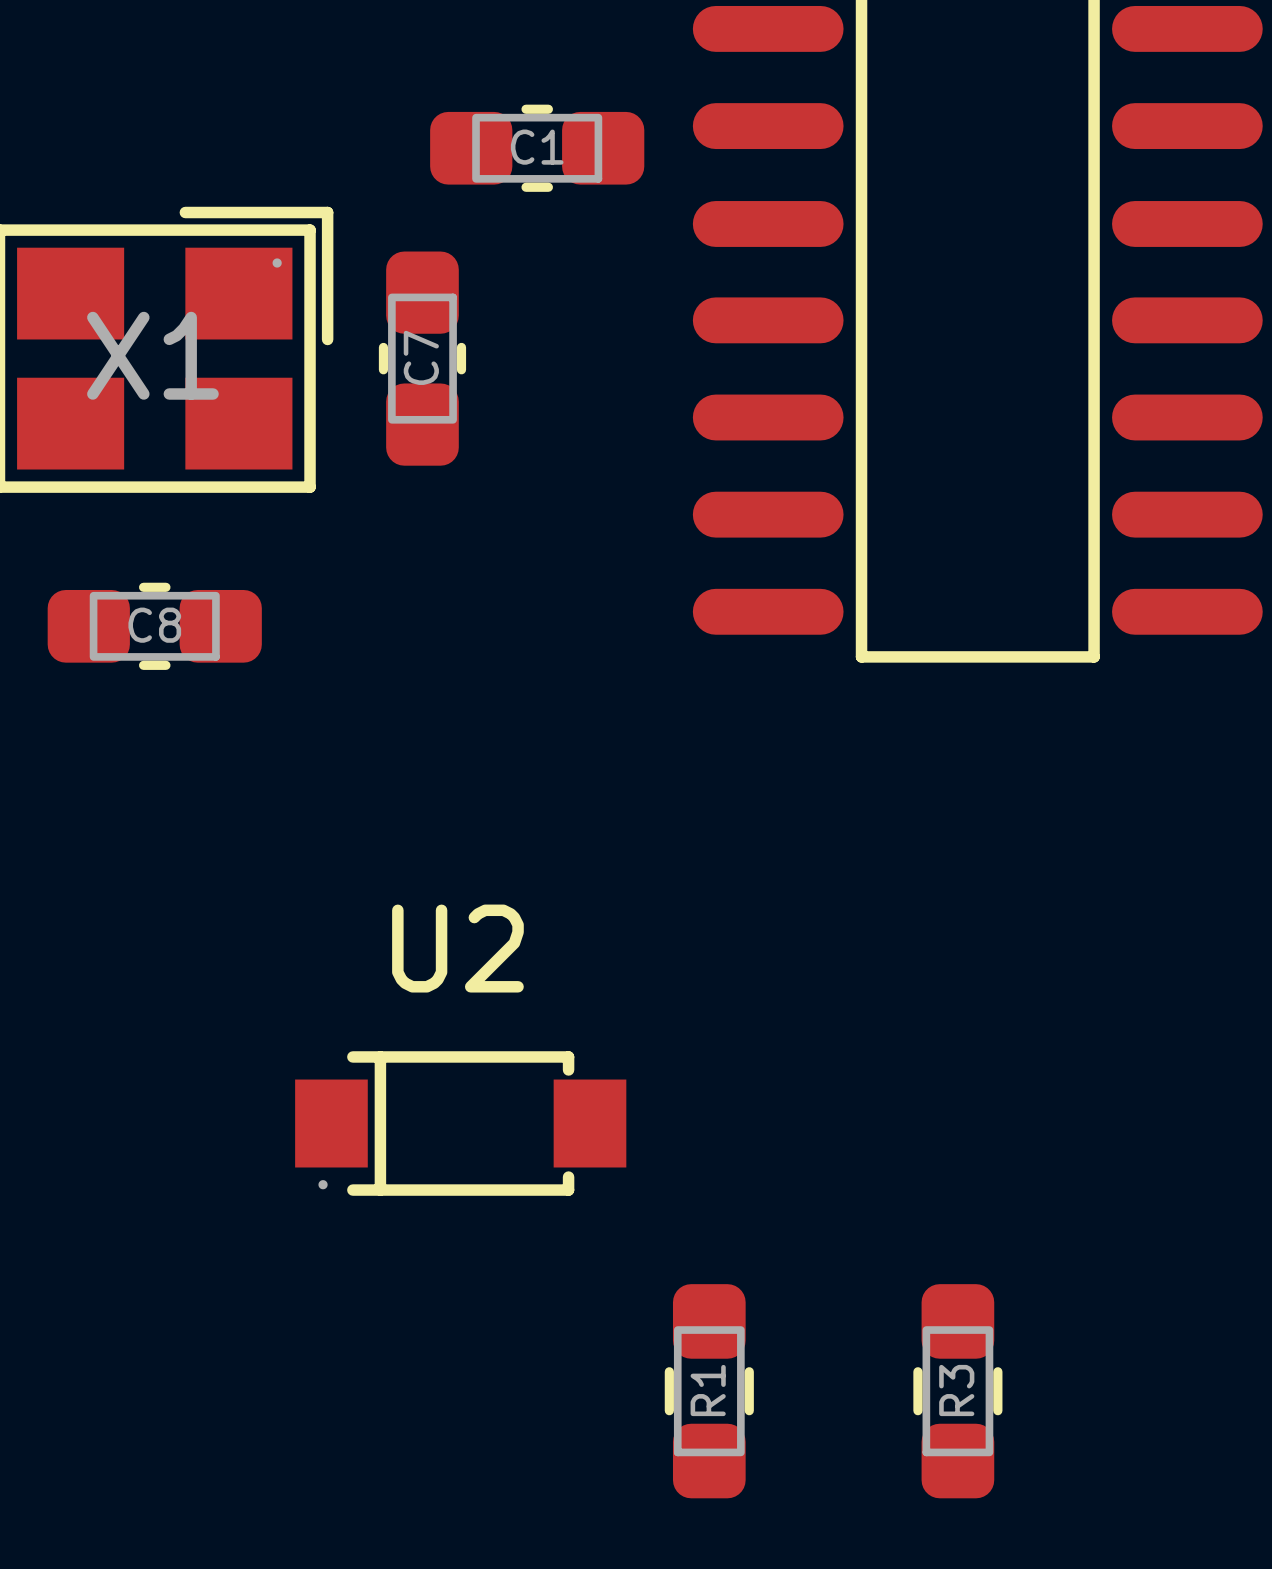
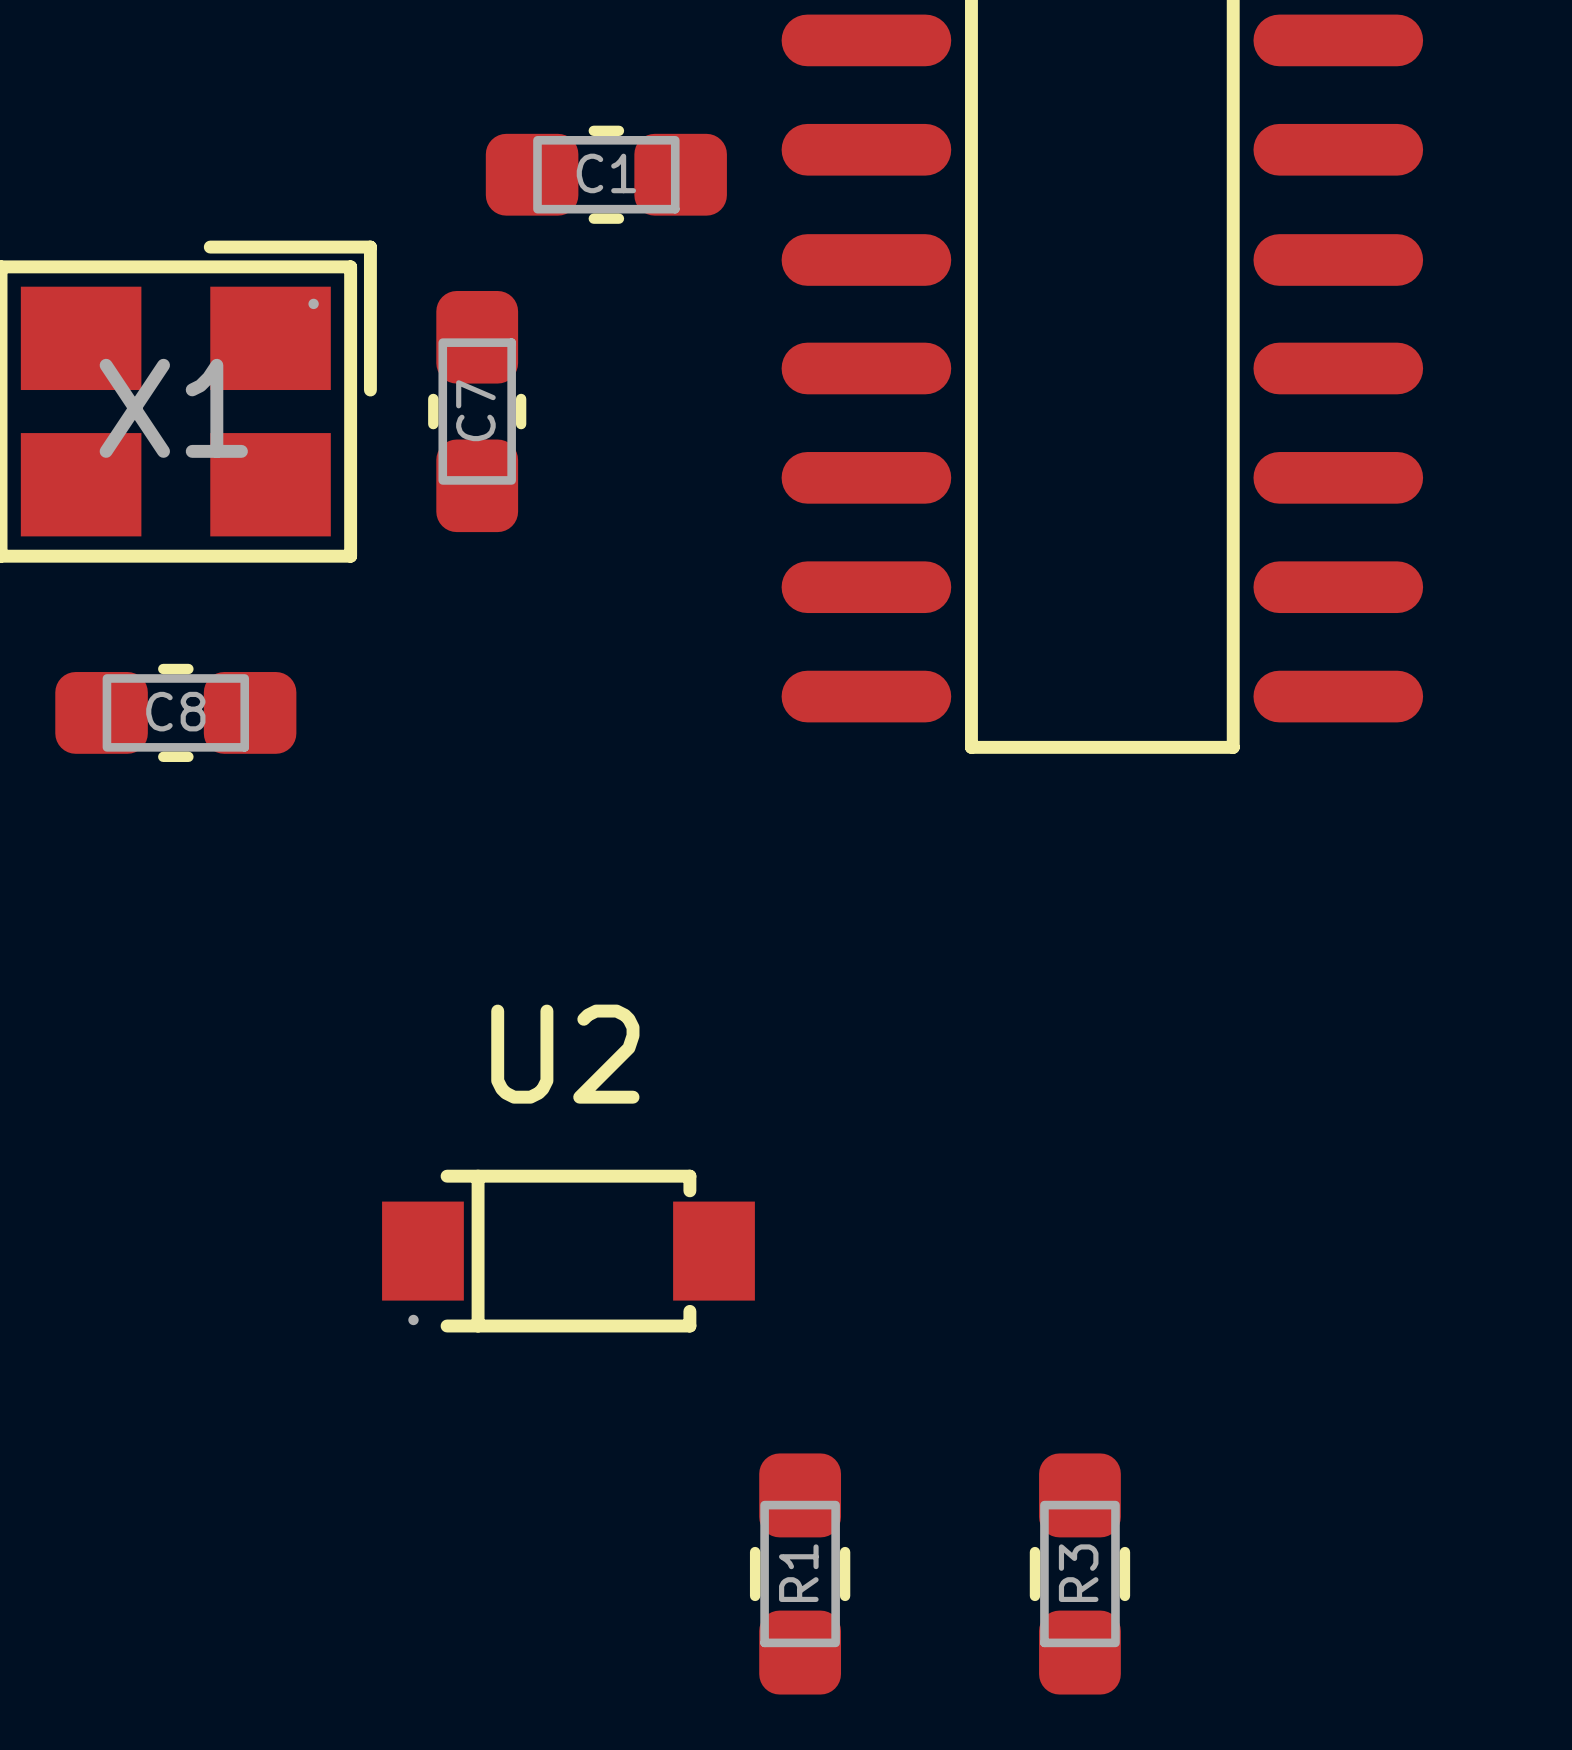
U2 position: (460, 1123) -> (568, 1251)

